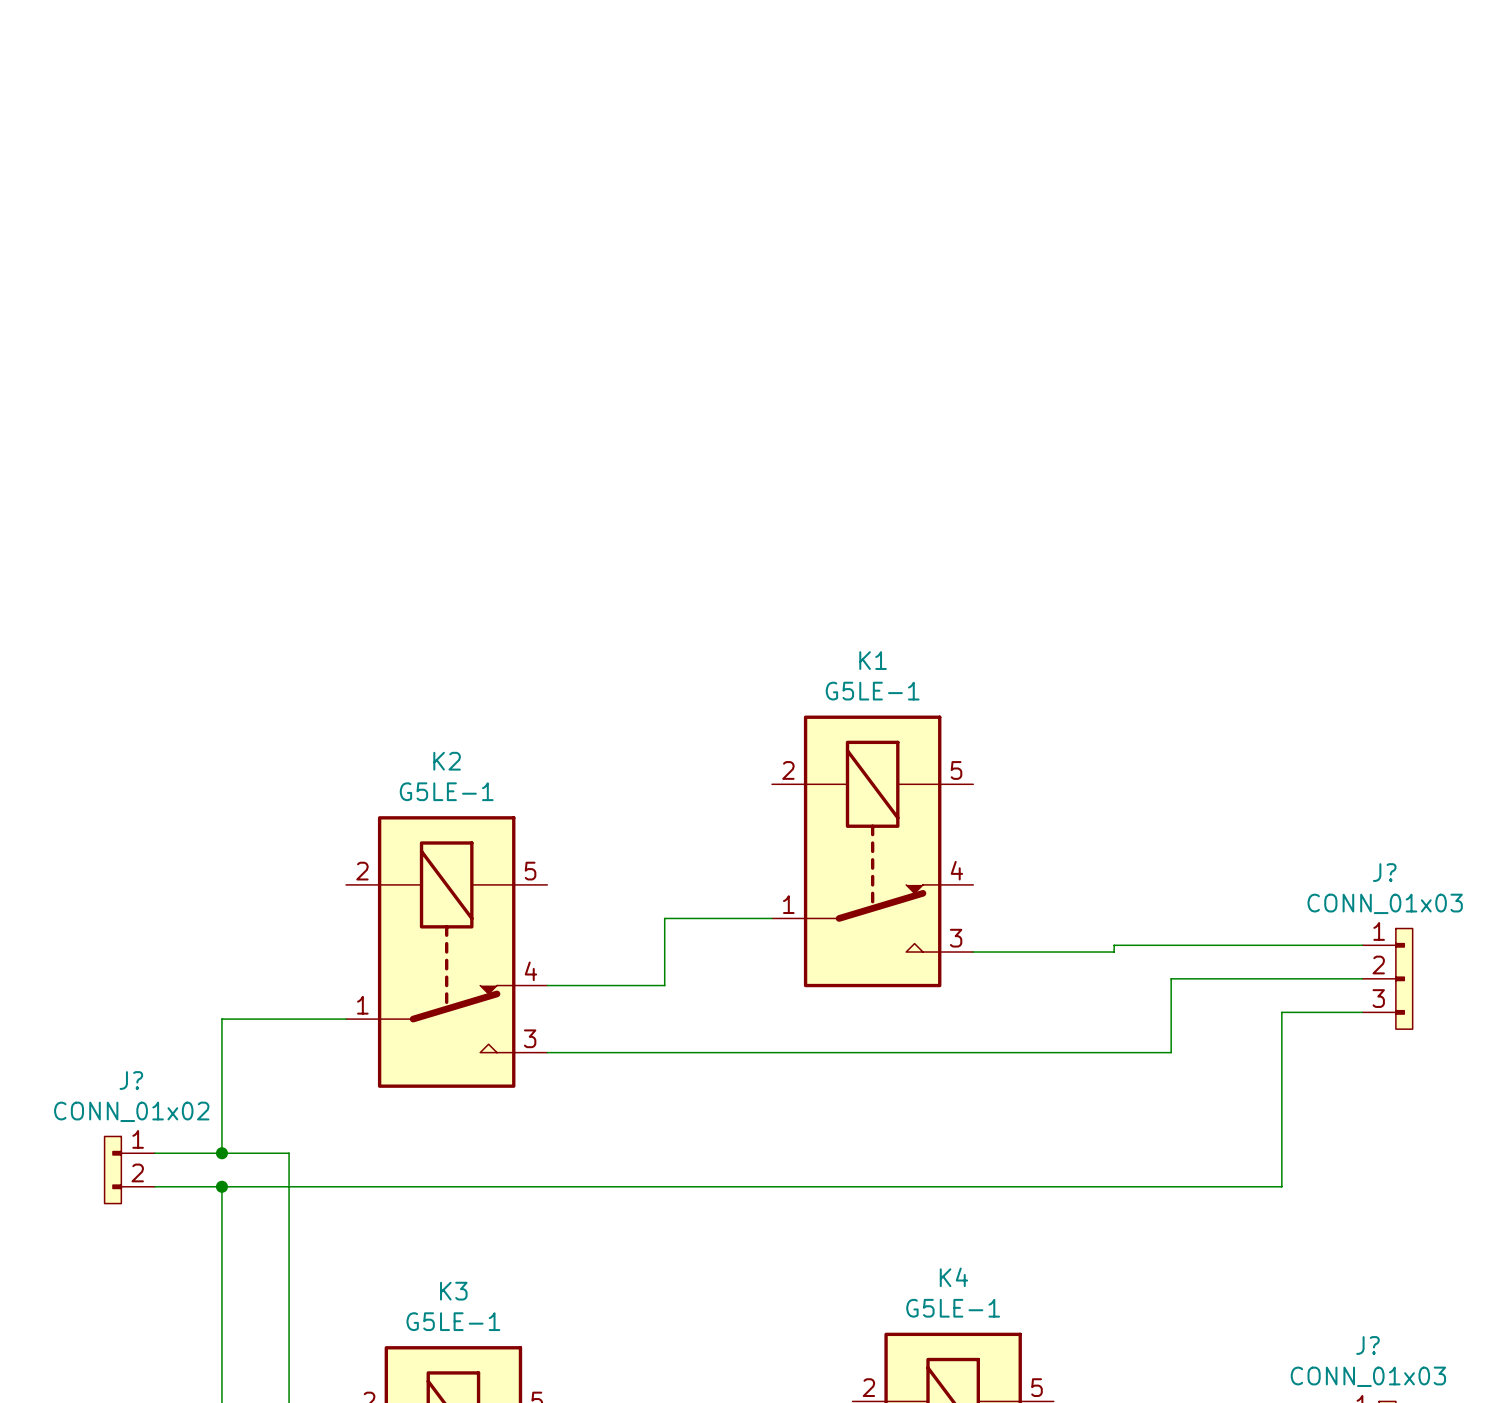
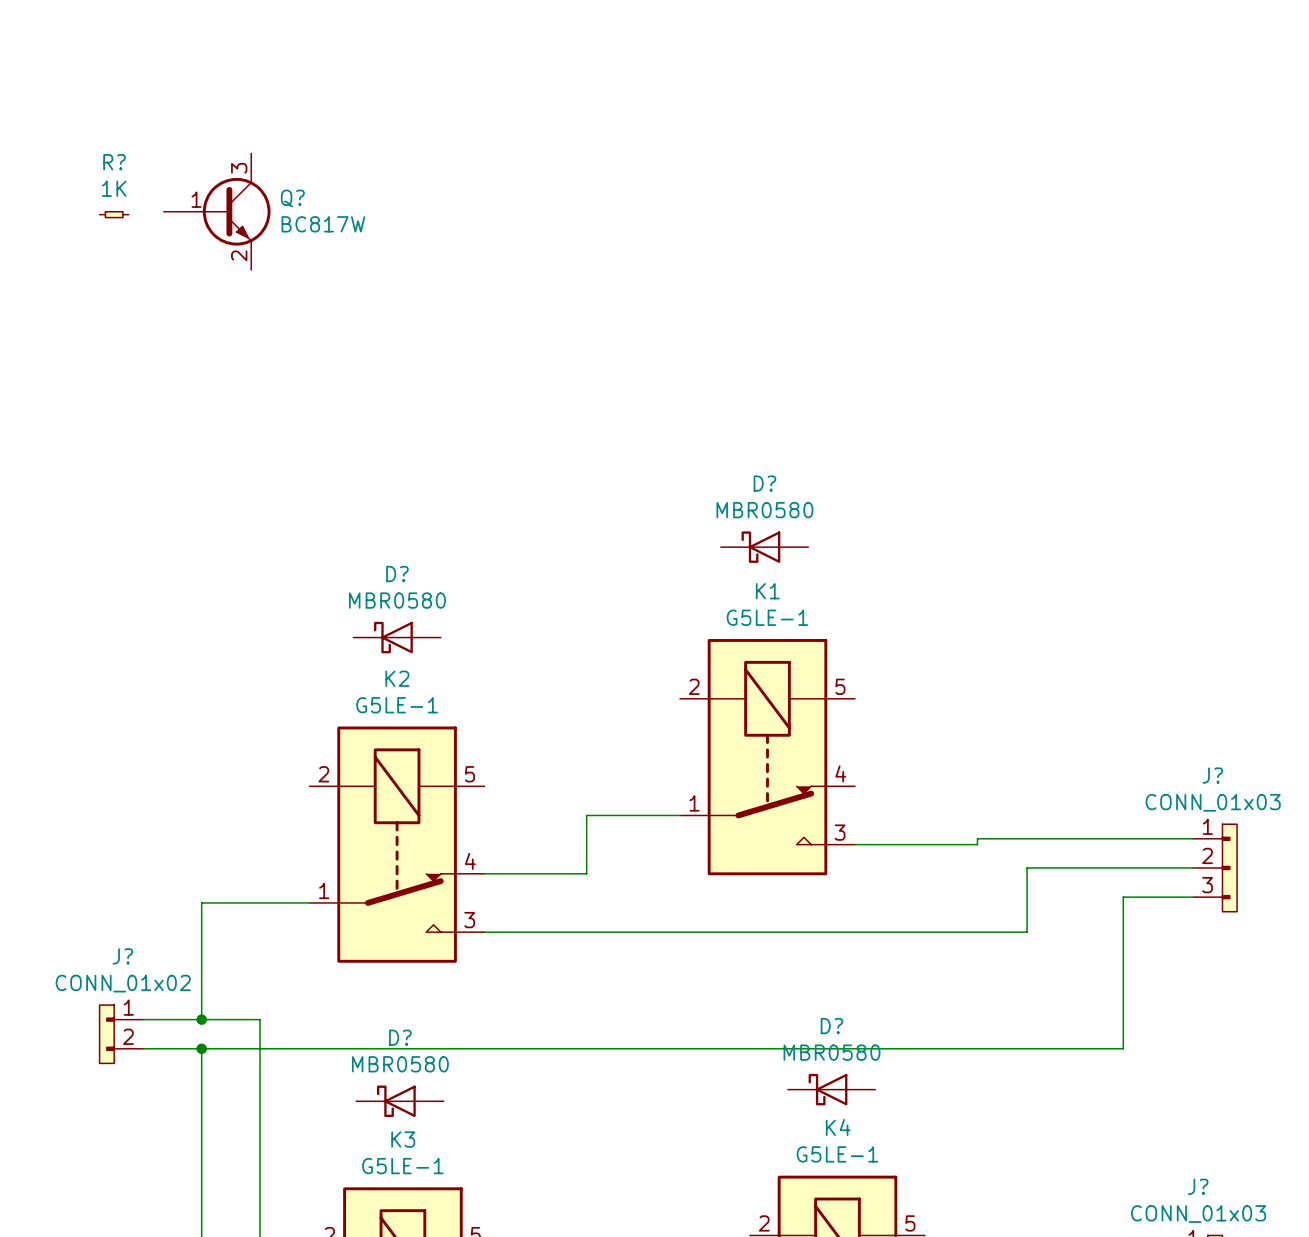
Q?: none -> BC817W (217, 211)
R?: none -> 1K (114, 214)
D?: none -> MBR0580 (764, 547)
D?: none -> MBR0580 (397, 637)
D?: none -> MBR0580 (831, 1089)
D?: none -> MBR0580 (400, 1101)

